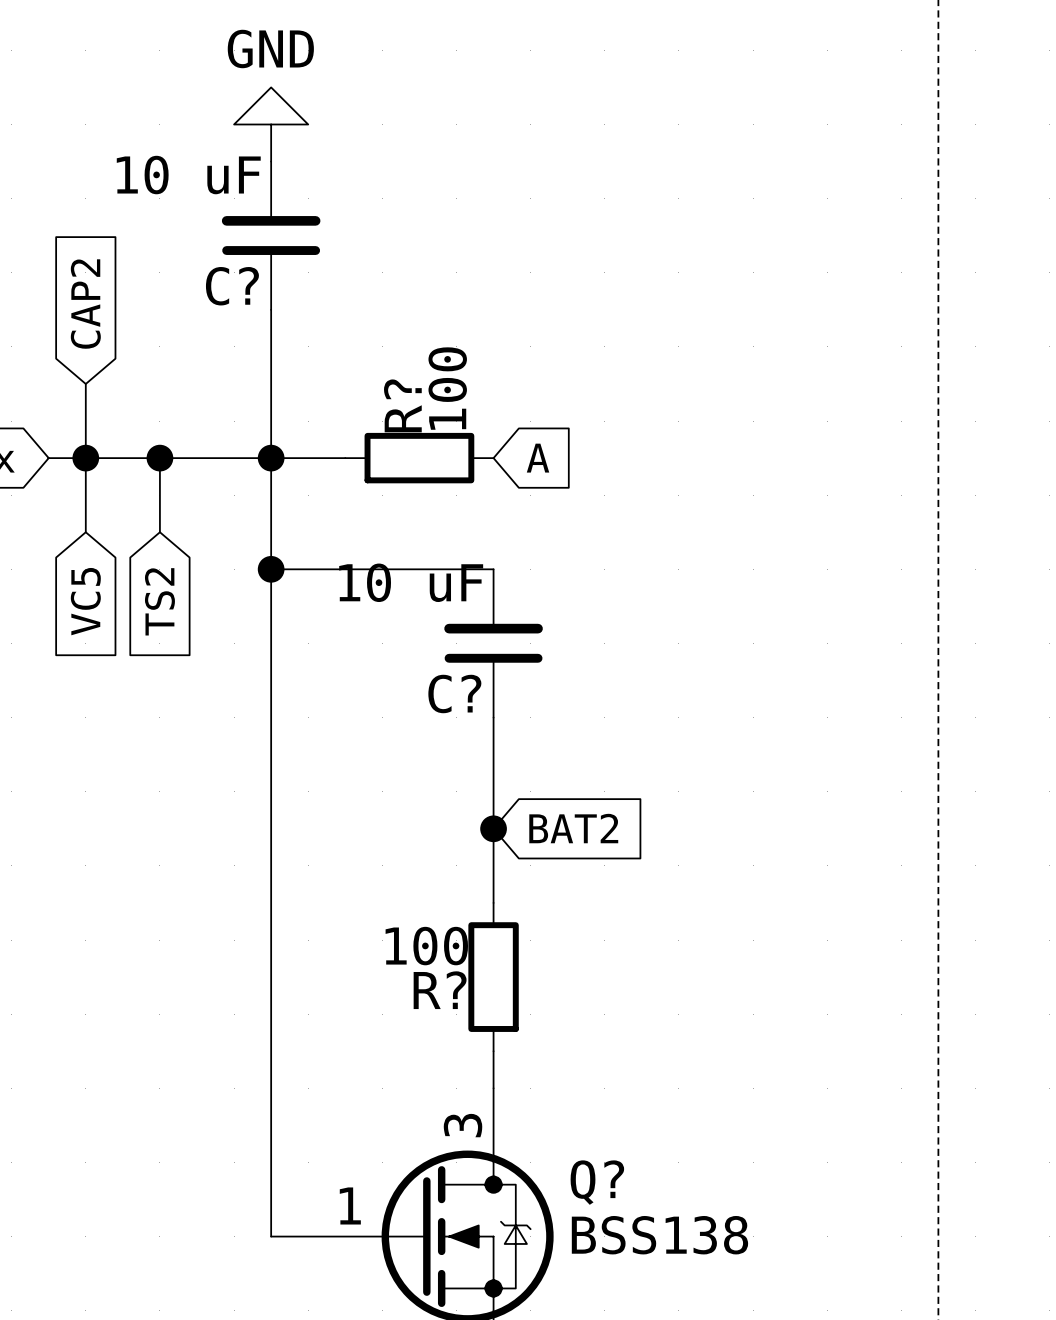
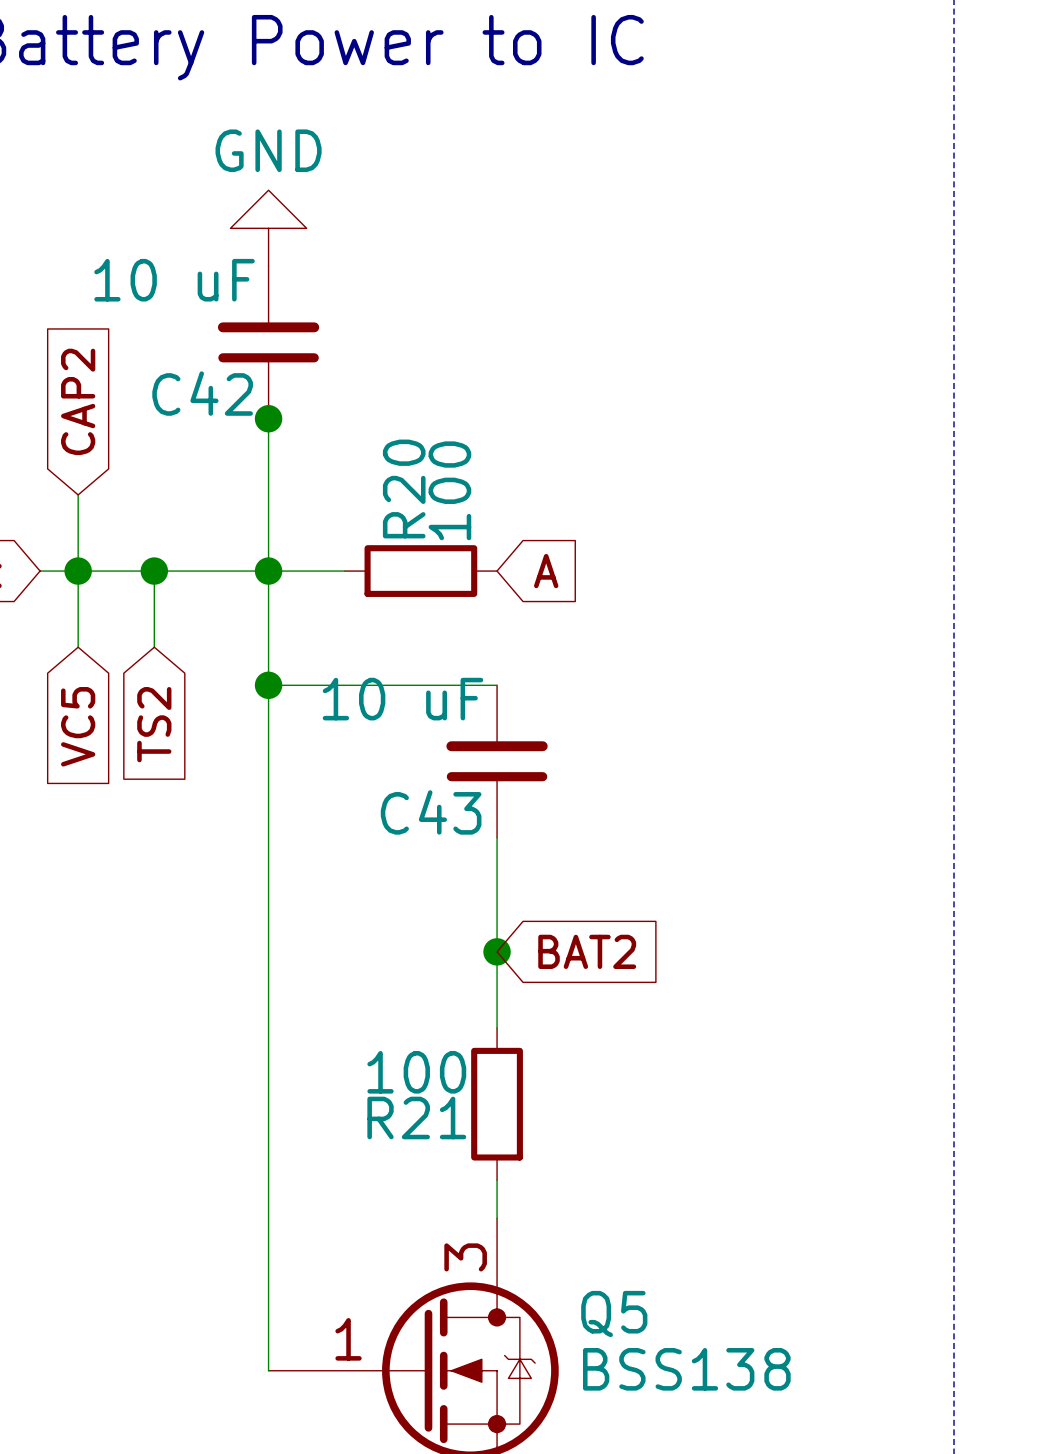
C? name: C? (232, 286) -> C42 (202, 393)
junction: none -> (268, 418)
R? name: R? (402, 405) -> R20 (404, 488)
C? name: C? (454, 693) -> C43 (431, 812)
R? name: R? (440, 990) -> R21 (416, 1117)
Q? name: Q? (597, 1182) -> Q5 (614, 1314)

